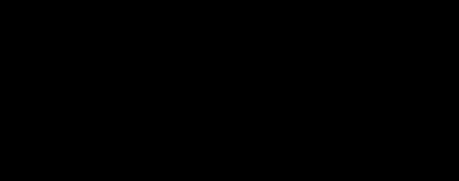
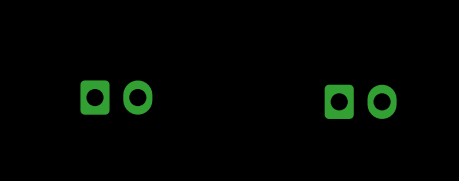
part: none -> (116, 97)
part: none -> (360, 101)

